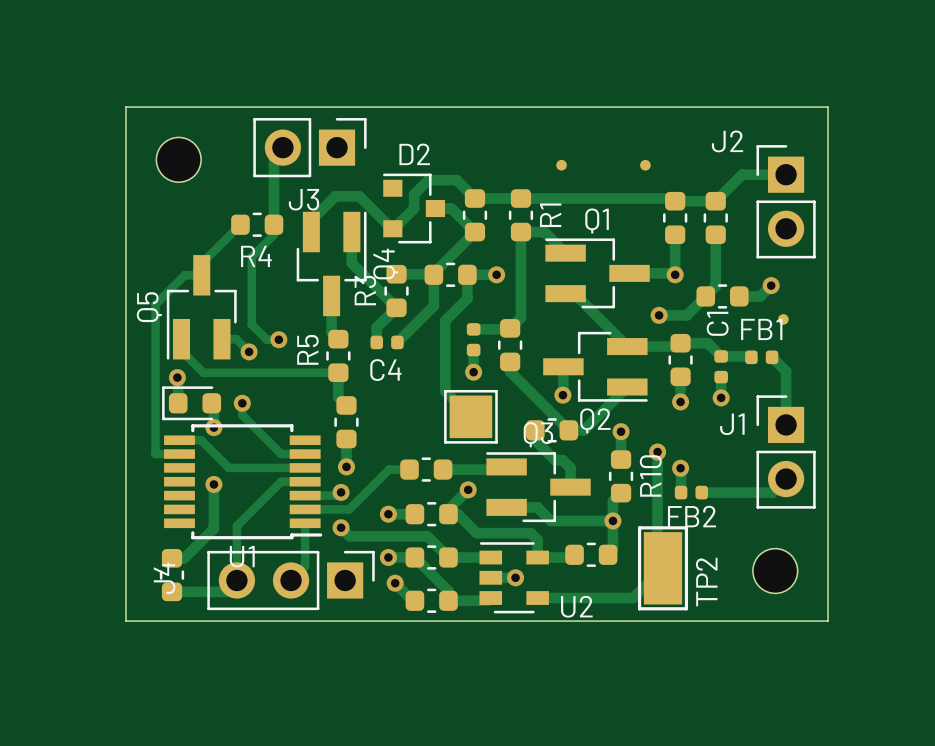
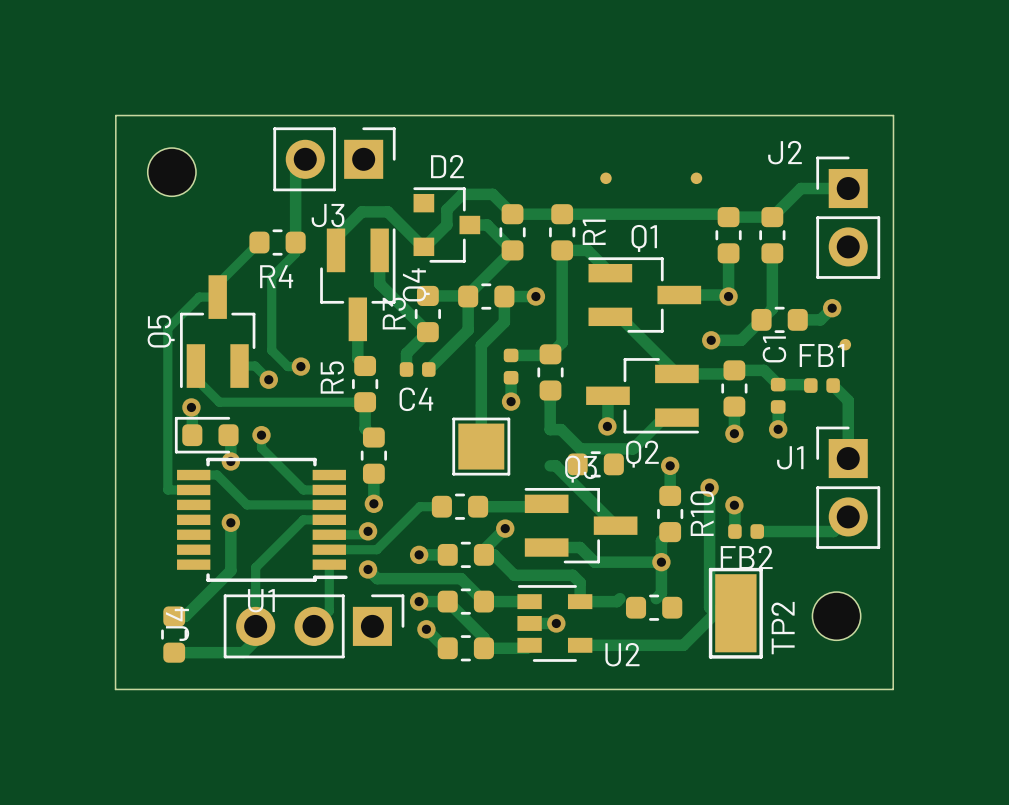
board edge: (126, 107) (126, 621) (828, 621) (828, 107) -> (135, 115) (115, 115) (115, 689) (893, 689) (893, 115)
part position: (178, 159) -> (171, 172)
track: (446, 319) (445, 391) (470, 416) -> (481, 345) (481, 446)
track: (510, 371) (568, 430) (583, 430) (627, 387) -> (550, 401) (550, 429) (561, 429) (580, 448) (632, 448) (664, 417) (676, 417)
part position: (470, 416) -> (481, 446)
track: (535, 430) (535, 440) (554, 460) (562, 460) (570, 467) (570, 487) -> (550, 465) (555, 465) (615, 525)
track: (213, 528) (184, 558) (172, 558) -> (230, 570) (185, 616) (174, 616)
part position: (591, 554) -> (654, 607)
TP2 position: (663, 568) -> (735, 613)
part position: (172, 575) -> (174, 634)
track: (236, 580) (225, 591) (172, 591) -> (255, 626) (255, 640) (243, 652) (174, 652)

